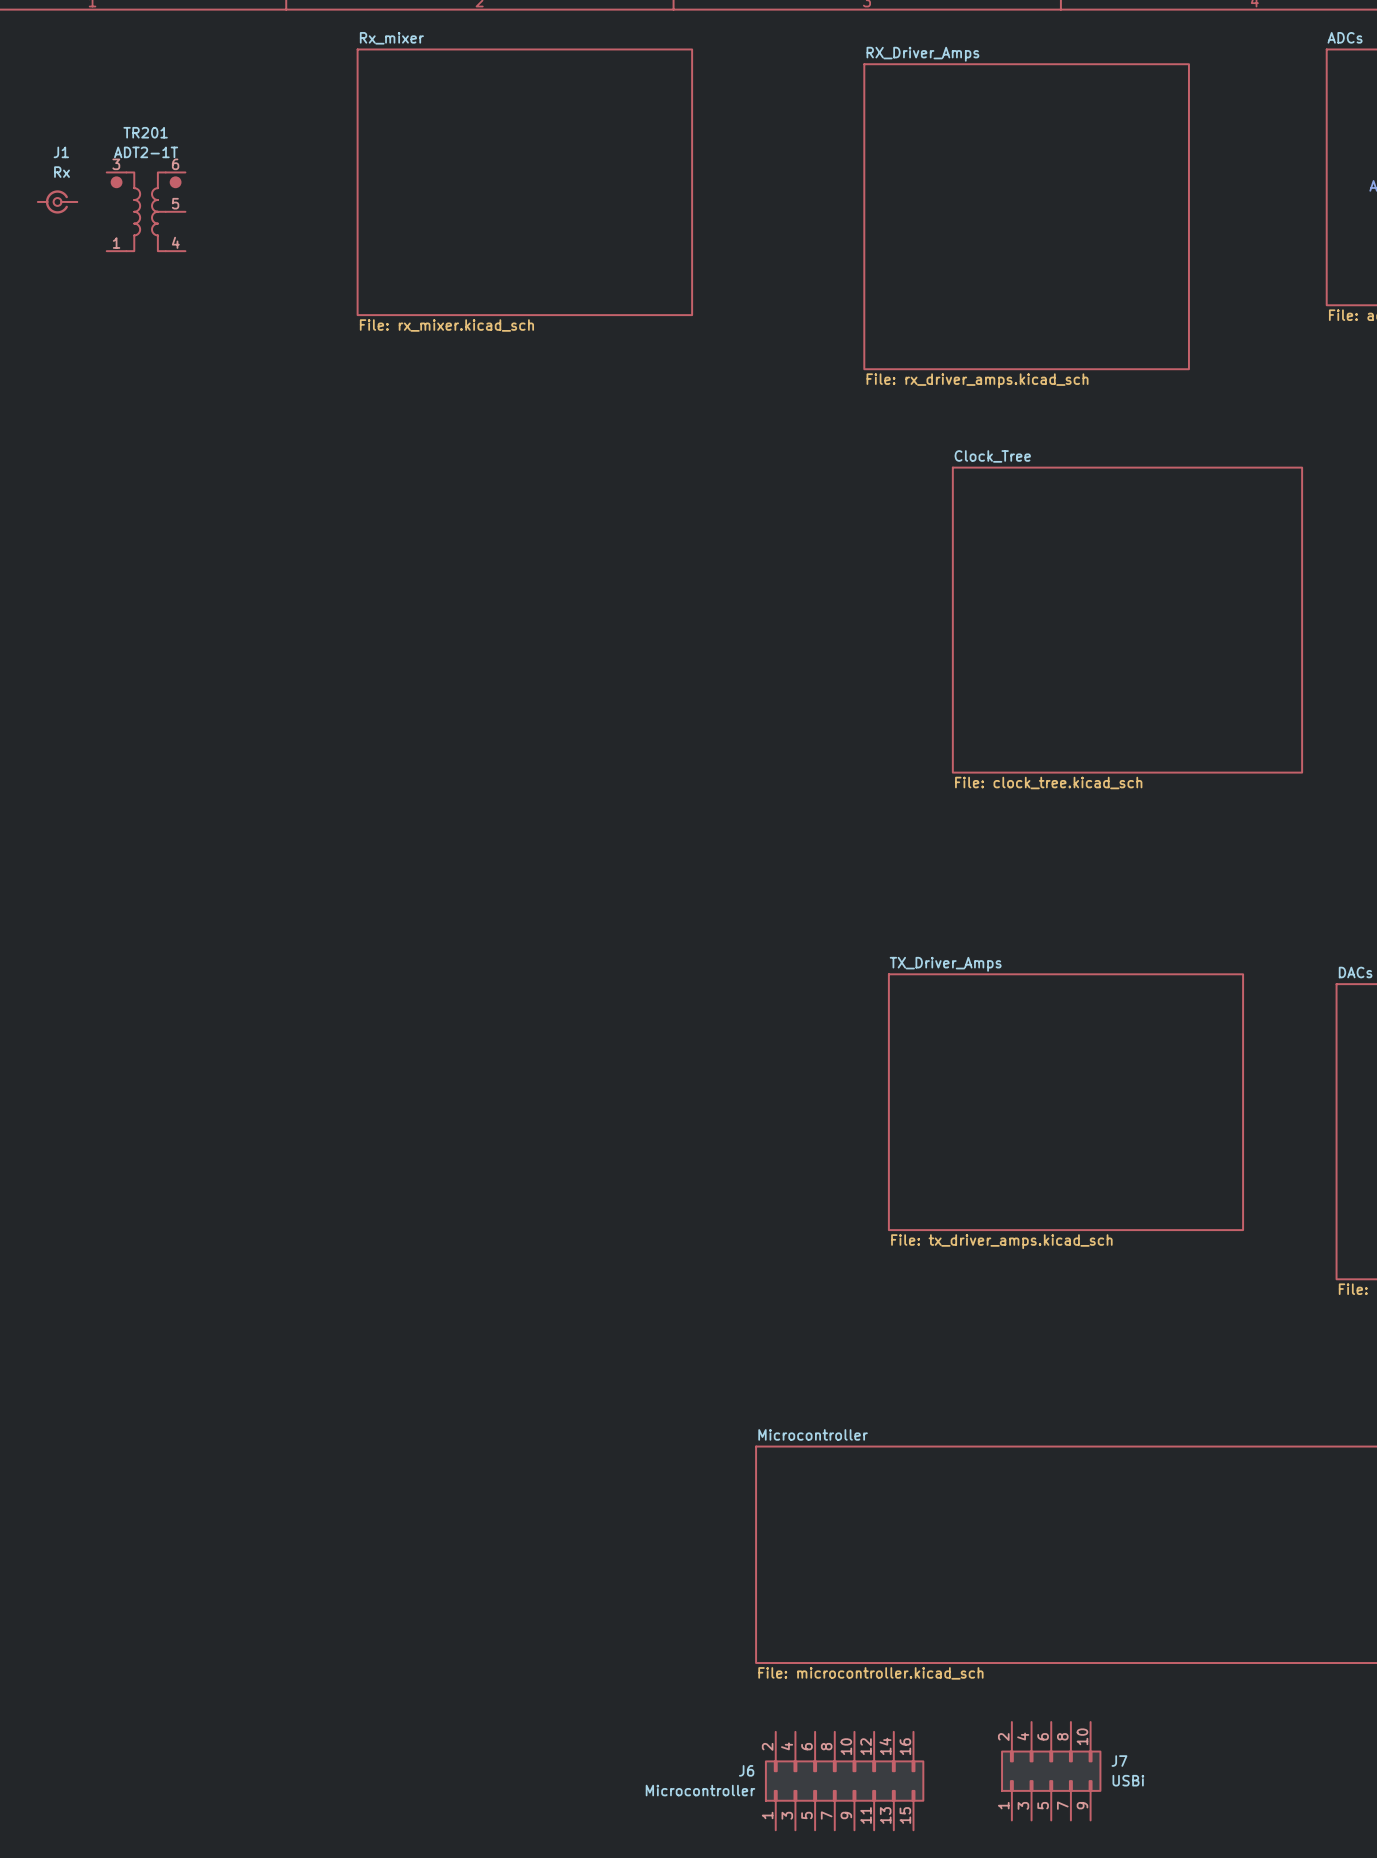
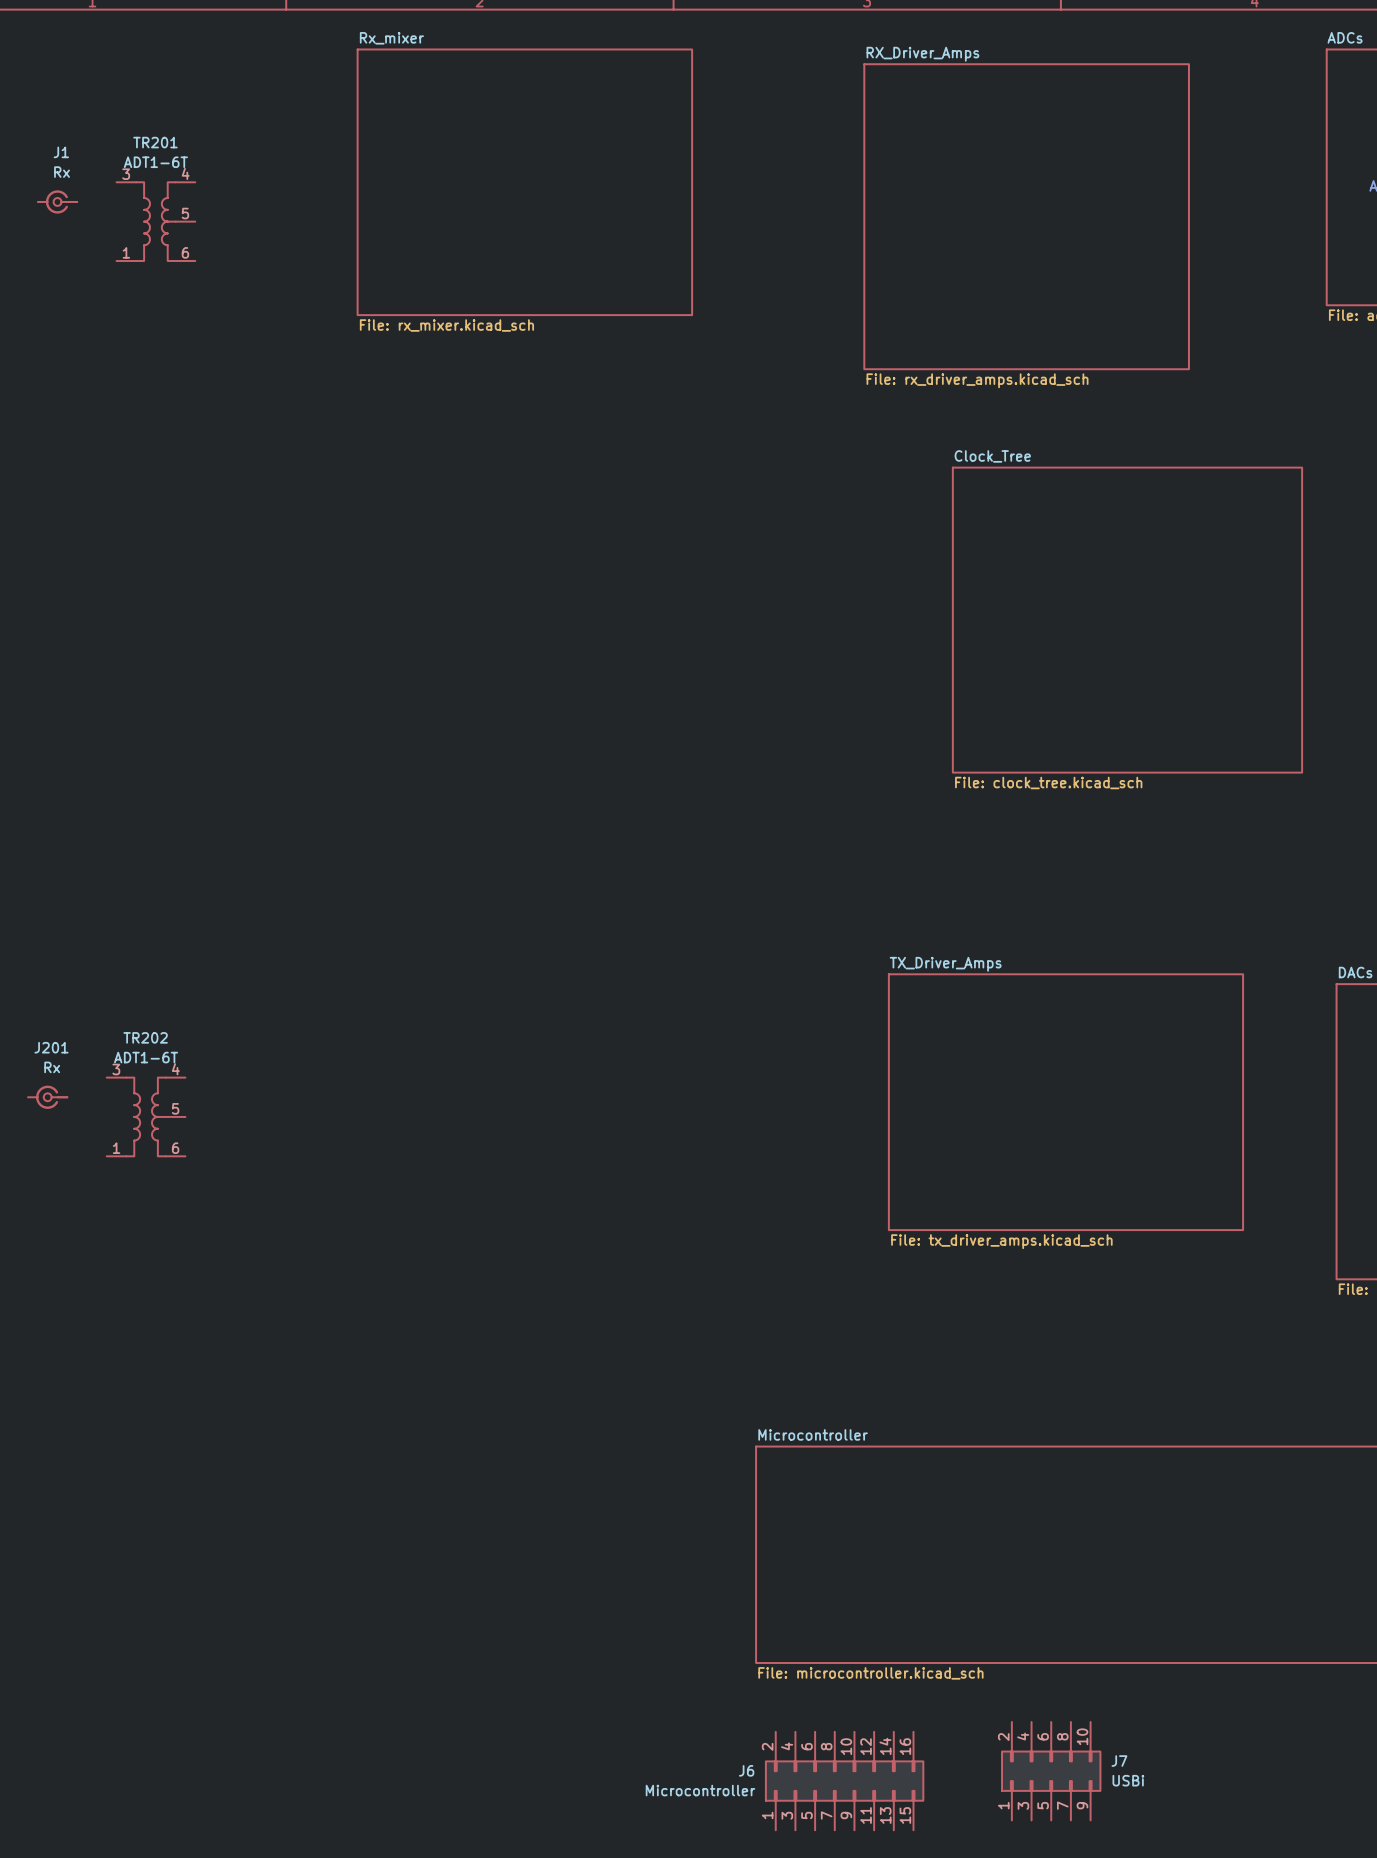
TR201 value: ADT2-1T (146, 152) -> ADT1-6T (155, 162)
TR201 symbol: [106, 171, 186, 252] -> [116, 181, 196, 262]
J201: none -> Rx (47, 1097)
TR202: none -> ADT1-6T (146, 1116)

